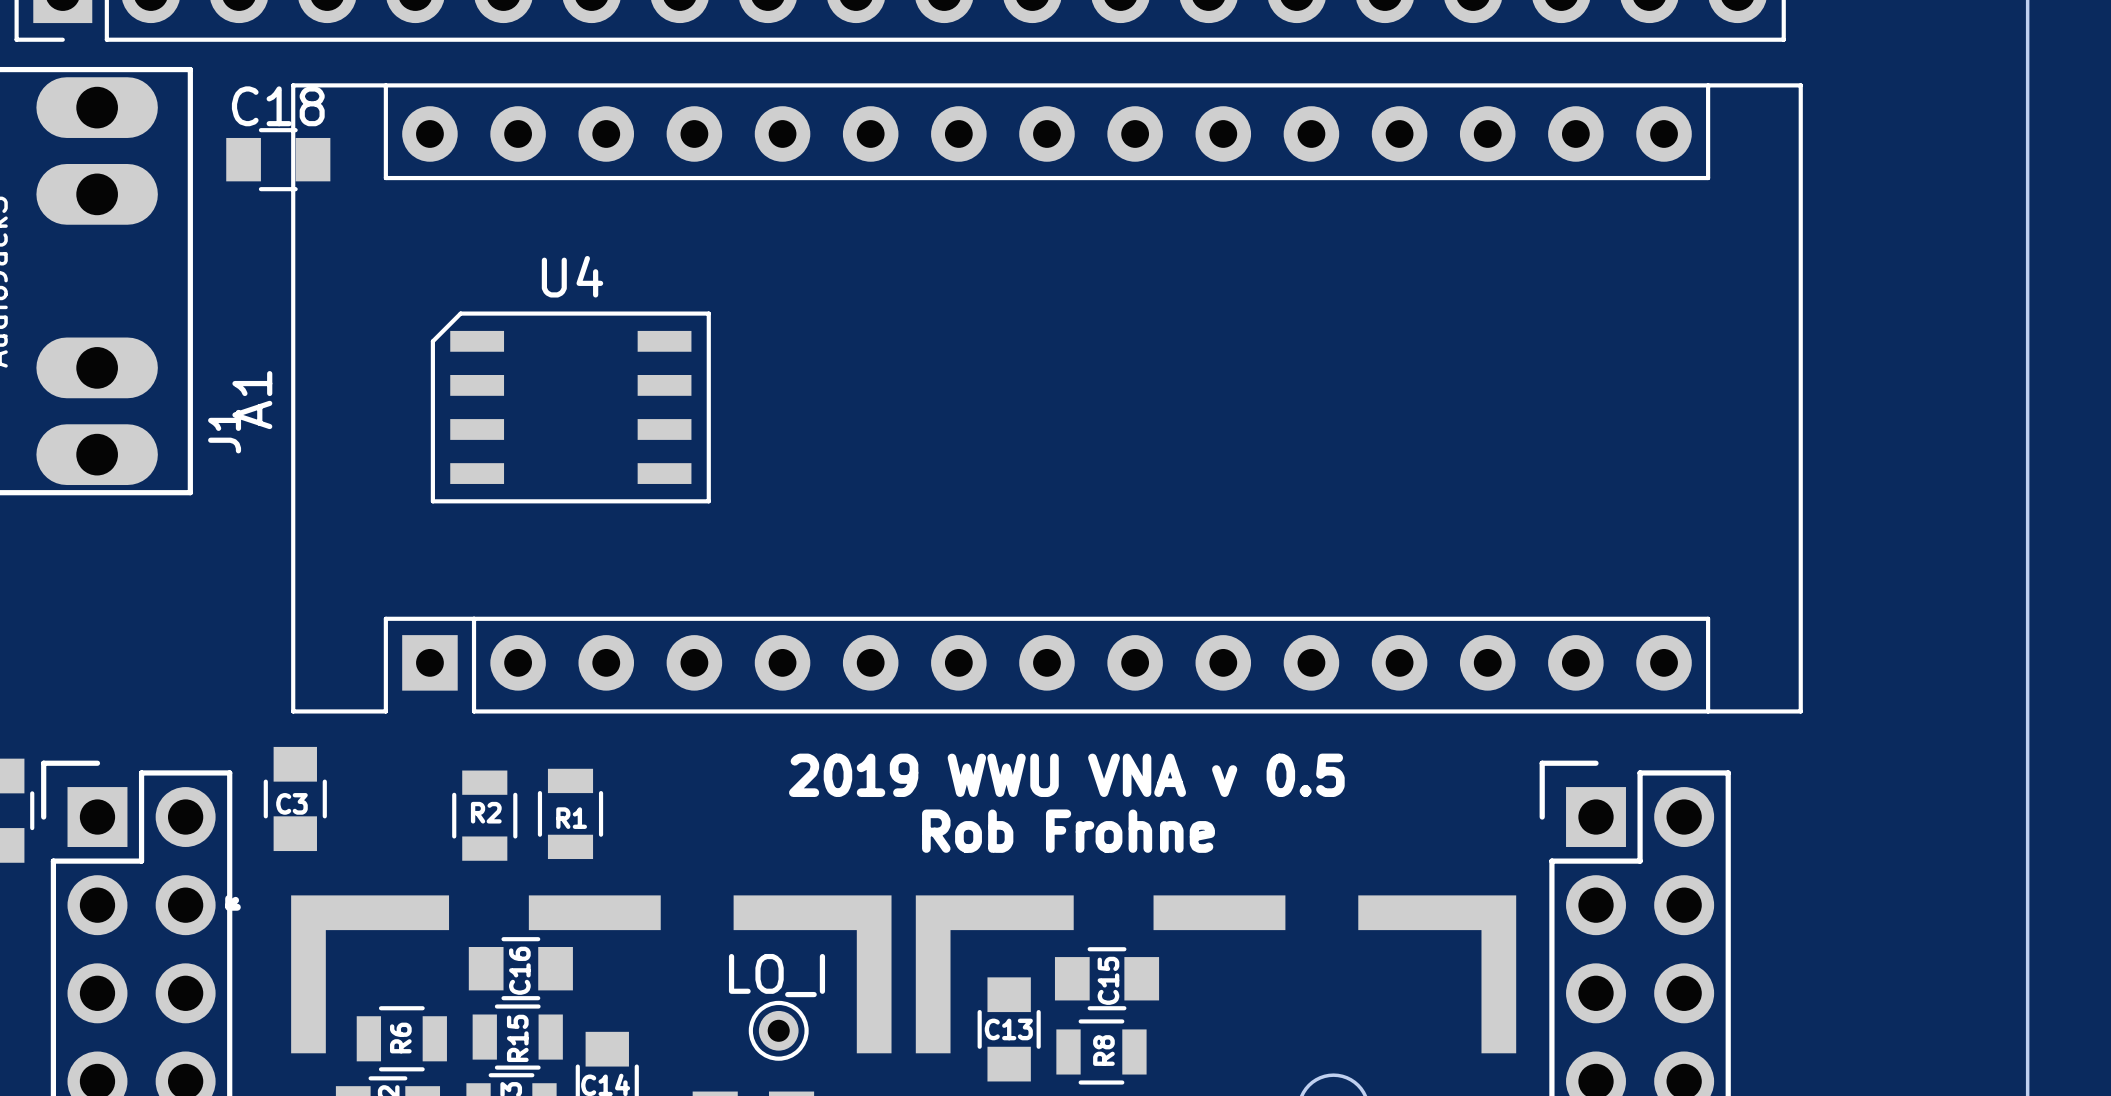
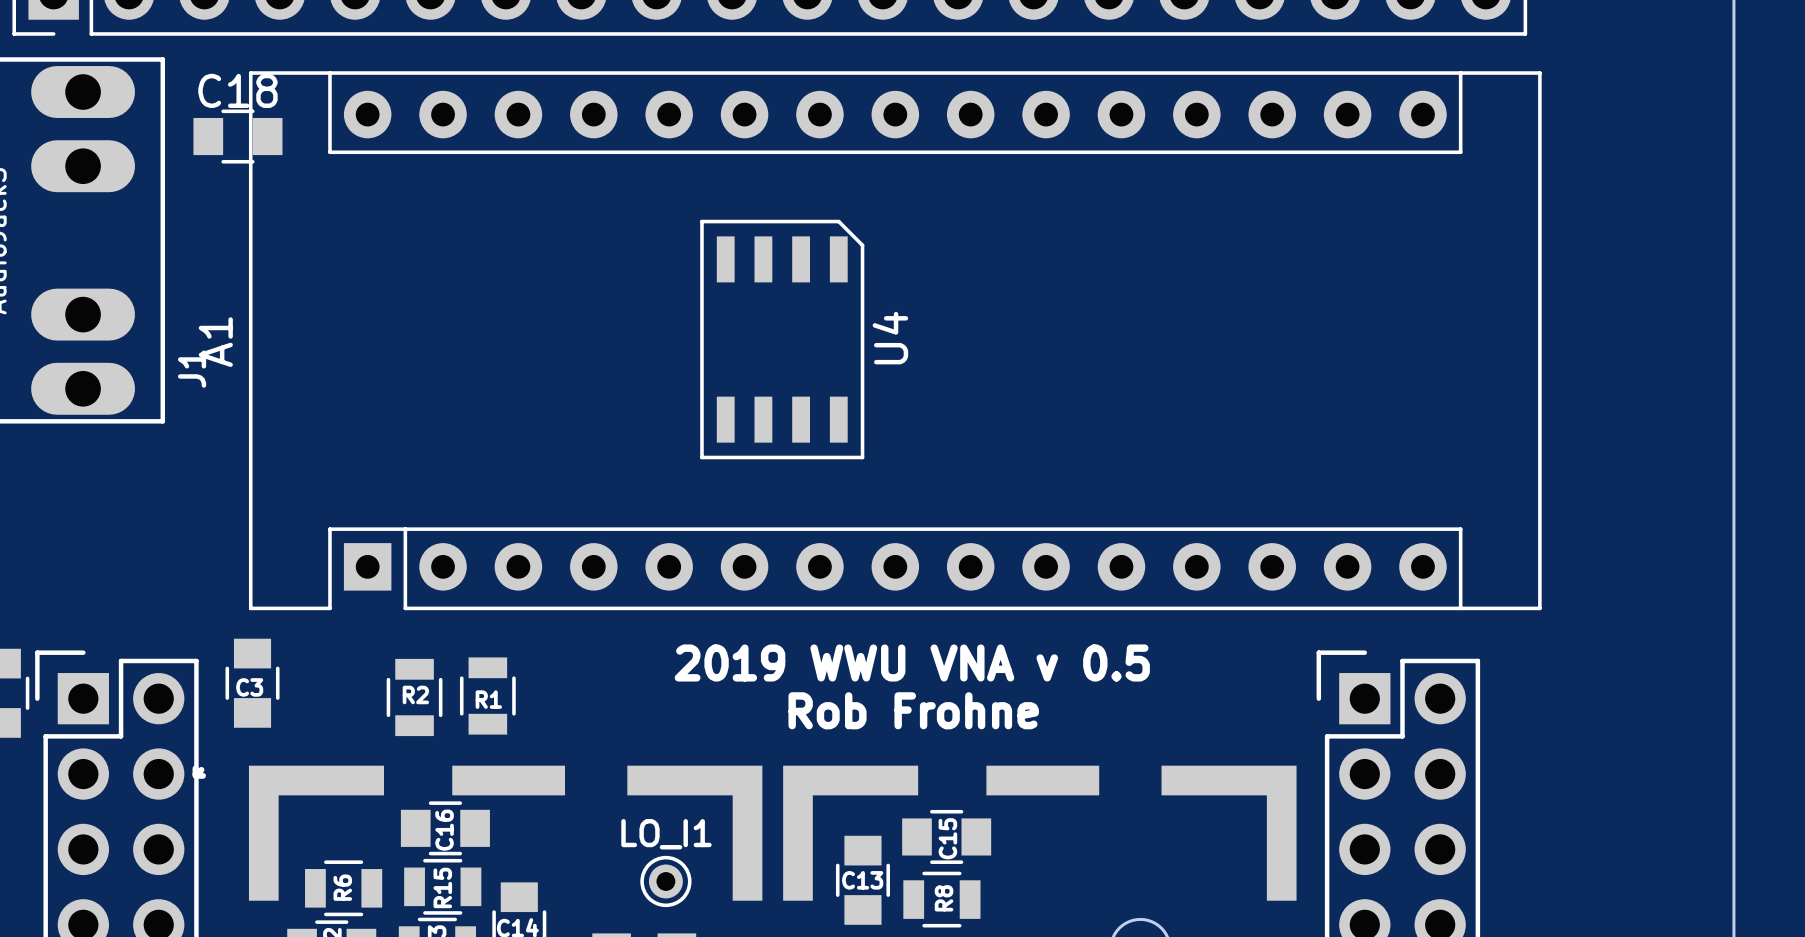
U4 rotation: 0° (570, 407) -> 90° clockwise (782, 339)
U4 position: (570, 407) -> (782, 339)
LO_I1 value: LO_I (776, 975) -> none
LO_I1 name: none -> LO_I1 (666, 834)

